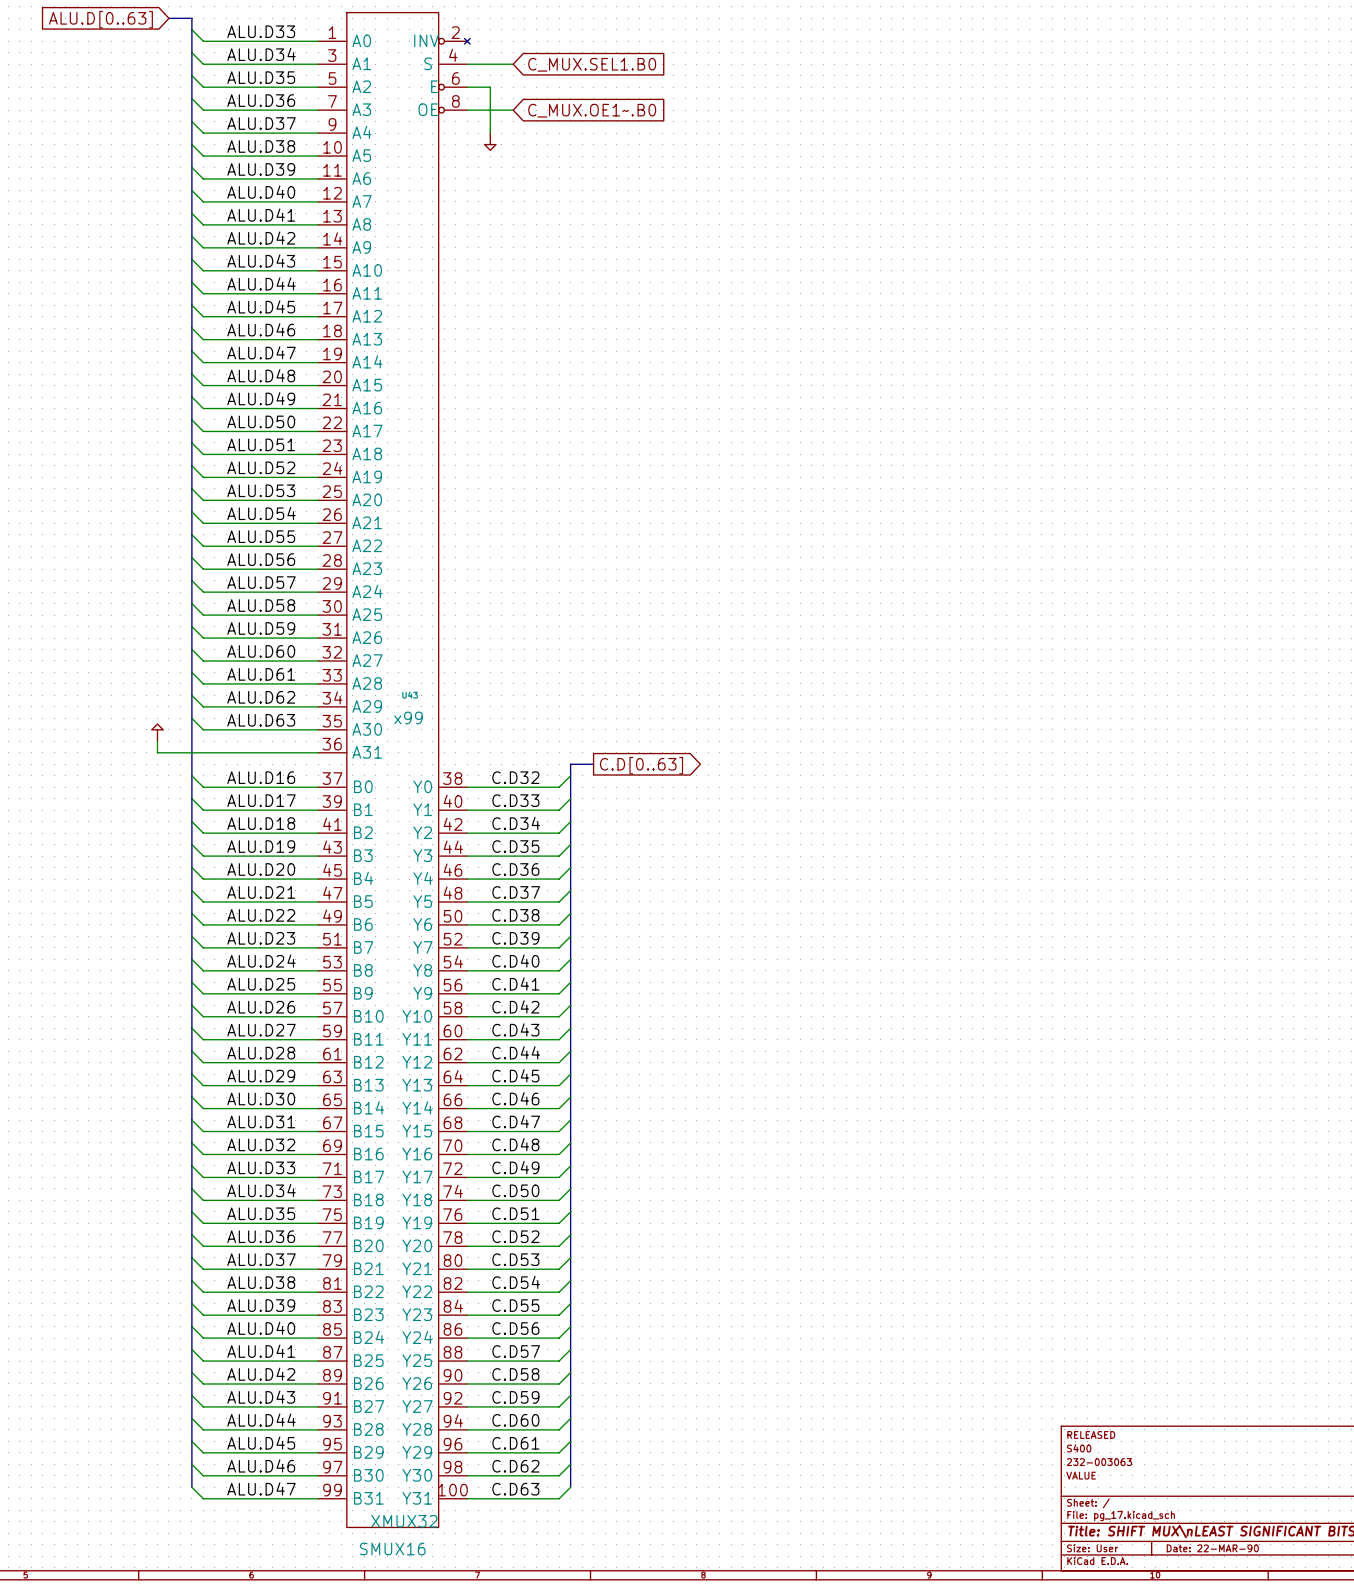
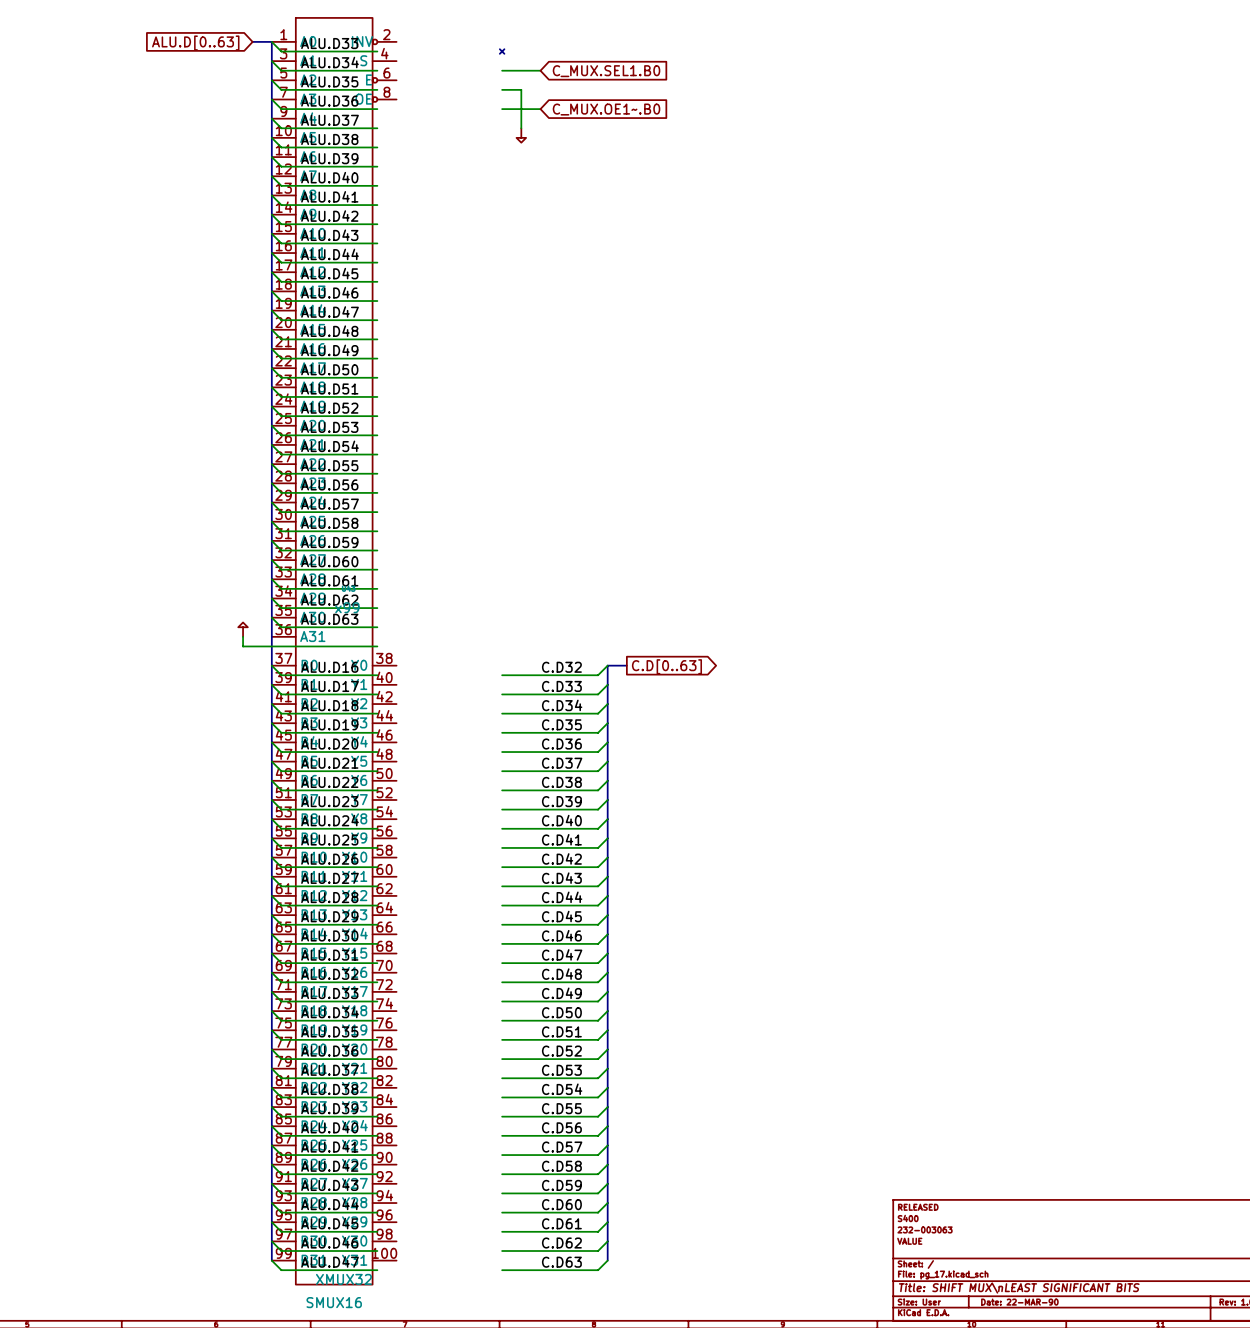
bus: (168, 18) (191, 18) (191, 1487) -> none
global label: ALU.D[0..63] (100, 19) -> none
wire: (191, 29) (203, 41) (318, 41) -> (377, 51) (281, 51) (271, 41)
label: ALU.D33 (261, 31) -> none
bus: none -> (252, 41) (271, 41) (271, 1260)
no-connect mark: (467, 41) -> none
global label: none -> ALU.D[0..63] (195, 43)
label: none -> ALU.D33 (329, 43)
wire: (191, 52) (203, 64) (318, 64) -> (377, 70) (281, 70) (271, 61)
no-connect mark: none -> (502, 51)
label: ALU.D34 (261, 54) -> none
wire: (467, 64) (513, 64) -> none
global label: C_MUX.SEL1.B0 (592, 64) -> none
label: none -> ALU.D34 (330, 62)
wire: (191, 75) (203, 87) (318, 87) -> (377, 89) (281, 89) (271, 80)
global label: none -> C_MUX.SEL1.B0 (606, 71)
label: ALU.D35 (261, 77) -> none
wire: (467, 87) (490, 87) (490, 133) -> none
label: none -> ALU.D35 (329, 81)
wire: (191, 98) (203, 110) (318, 110) -> (377, 109) (281, 109) (271, 99)
wire: none -> (502, 89) (521, 89) (521, 128)
label: ALU.D36 (261, 100) -> none
wire: (467, 110) (513, 110) -> none
global label: C_MUX.OE1~.B0 (592, 110) -> none
label: none -> ALU.D36 (329, 101)
wire: (191, 121) (203, 133) (318, 133) -> (377, 128) (281, 128) (271, 118)
global label: none -> C_MUX.OE1~.B0 (606, 109)
label: ALU.D37 (261, 123) -> none
label: none -> ALU.D37 (330, 120)
power symbol: (490, 141) -> none
wire: (191, 144) (203, 156) (318, 156) -> (377, 147) (281, 147) (271, 137)
label: ALU.D38 (261, 146) -> none
power symbol: none -> (521, 135)
label: none -> ALU.D38 (329, 139)
wire: (191, 167) (203, 178) (318, 178) -> (377, 166) (281, 166) (271, 157)
label: ALU.D39 (261, 169) -> none
label: none -> ALU.D39 (329, 158)
wire: (191, 190) (203, 201) (318, 201) -> (377, 185) (281, 185) (271, 176)
label: ALU.D40 (261, 192) -> none
label: none -> ALU.D40 (329, 177)
wire: (191, 213) (203, 224) (318, 224) -> (377, 205) (281, 205) (271, 195)
label: ALU.D41 (261, 215) -> none
label: none -> ALU.D41 (329, 196)
wire: (191, 236) (203, 247) (318, 247) -> (377, 224) (281, 224) (271, 214)
label: ALU.D42 (261, 238) -> none
label: none -> ALU.D42 (329, 216)
wire: (191, 259) (203, 270) (318, 270) -> (377, 243) (281, 243) (271, 233)
label: ALU.D43 (261, 260) -> none
label: none -> ALU.D43 (329, 235)
wire: (191, 282) (203, 293) (318, 293) -> (377, 262) (281, 262) (271, 253)
label: ALU.D44 (261, 283) -> none
label: none -> ALU.D44 (330, 254)
wire: (191, 305) (203, 316) (318, 316) -> (377, 281) (281, 281) (271, 272)
label: ALU.D45 (261, 306) -> none
label: none -> ALU.D45 (329, 273)
wire: (191, 328) (203, 339) (318, 339) -> (377, 301) (281, 301) (271, 291)
label: ALU.D46 (261, 329) -> none
label: none -> ALU.D46 (329, 292)
wire: (191, 351) (203, 362) (318, 362) -> (377, 320) (281, 320) (271, 310)
label: ALU.D47 (261, 352) -> none
label: none -> ALU.D47 (330, 311)
wire: (191, 374) (203, 385) (318, 385) -> (377, 339) (281, 339) (271, 329)
label: ALU.D48 (261, 375) -> none
label: none -> ALU.D48 (329, 331)
wire: (191, 397) (203, 408) (318, 408) -> (377, 358) (281, 358) (271, 348)
label: ALU.D49 (261, 398) -> none
label: none -> ALU.D49 (329, 350)
wire: (191, 419) (203, 431) (318, 431) -> (377, 377) (281, 377) (271, 368)
label: ALU.D50 (261, 421) -> none
label: none -> ALU.D50 (329, 369)
wire: (191, 442) (203, 454) (318, 454) -> (377, 396) (281, 396) (271, 387)
label: ALU.D51 (261, 444) -> none
label: none -> ALU.D51 (329, 388)
wire: (191, 465) (203, 477) (318, 477) -> (377, 416) (281, 416) (271, 406)
label: ALU.D52 (261, 467) -> none
label: none -> ALU.D52 (329, 408)
wire: (191, 488) (203, 500) (318, 500) -> (377, 435) (281, 435) (271, 425)
label: ALU.D53 (261, 490) -> none
label: none -> ALU.D53 (329, 427)
wire: (191, 511) (203, 523) (318, 523) -> (377, 454) (281, 454) (271, 444)
label: ALU.D54 (261, 513) -> none
label: none -> ALU.D54 (330, 446)
wire: (191, 534) (203, 546) (318, 546) -> (377, 473) (281, 473) (271, 464)
label: ALU.D55 (261, 536) -> none
label: none -> ALU.D55 (329, 465)
wire: (191, 557) (203, 569) (318, 569) -> (377, 492) (281, 492) (271, 483)
label: ALU.D56 (261, 559) -> none
label: none -> ALU.D56 (329, 484)
wire: (191, 580) (203, 592) (318, 592) -> (377, 512) (281, 512) (271, 502)
label: ALU.D57 (261, 582) -> none
label: none -> ALU.D57 (330, 504)
wire: (191, 603) (203, 615) (318, 615) -> (377, 531) (281, 531) (271, 521)
label: ALU.D58 (261, 605) -> none
label: none -> ALU.D58 (329, 523)
wire: (191, 626) (203, 638) (318, 638) -> (377, 550) (281, 550) (271, 540)
label: ALU.D59 (261, 628) -> none
label: none -> ALU.D59 (329, 542)
wire: (191, 649) (203, 660) (318, 660) -> (377, 569) (281, 569) (271, 560)
label: ALU.D60 (261, 651) -> none
label: none -> ALU.D60 (329, 561)
wire: (191, 672) (203, 683) (318, 683) -> (377, 588) (281, 588) (271, 579)
label: ALU.D61 (261, 674) -> none
label: none -> ALU.D61 (329, 580)
wire: (191, 695) (203, 706) (318, 706) -> (377, 608) (281, 608) (271, 598)
label: ALU.D62 (261, 697) -> none
label: none -> ALU.D62 (329, 600)
wire: (191, 718) (203, 729) (318, 729) -> (377, 627) (281, 627) (271, 617)
label: ALU.D63 (261, 720) -> none
label: none -> ALU.D63 (329, 619)
power symbol: (157, 732) -> none
wire: (157, 741) (157, 752) (318, 752) -> none
power symbol: none -> (243, 629)
wire: none -> (243, 636) (243, 646) (377, 646)
bus: (593, 764) (570, 764) (570, 1487) -> none
global label: C.D[0..63] (641, 765) -> none
wire: (191, 775) (203, 787) (318, 787) -> (377, 675) (281, 675) (271, 665)
wire: (570, 775) (559, 787) (467, 787) -> none
label: ALU.D16 (261, 777) -> none
label: C.D32 (515, 777) -> none
wire: none -> (607, 665) (598, 675) (502, 675)
bus: none -> (626, 665) (607, 665) (607, 1260)
global label: none -> C.D[0..63] (666, 666)
label: none -> ALU.D16 (329, 667)
label: none -> C.D32 (561, 667)
wire: (191, 798) (203, 810) (318, 810) -> (377, 694) (281, 694) (271, 684)
wire: (570, 798) (559, 810) (467, 810) -> none
label: ALU.D17 (261, 800) -> none
label: C.D33 (515, 800) -> none
wire: none -> (607, 684) (598, 694) (502, 694)
label: none -> ALU.D17 (330, 686)
label: none -> C.D33 (561, 686)
wire: (191, 821) (203, 833) (318, 833) -> (377, 713) (281, 713) (271, 704)
wire: (570, 821) (559, 833) (467, 833) -> none
label: ALU.D18 (261, 823) -> none
label: C.D34 (516, 823) -> none
wire: none -> (607, 704) (598, 713) (502, 713)
label: none -> C.D34 (562, 705)
label: none -> ALU.D18 (329, 705)
wire: (191, 844) (203, 856) (318, 856) -> (377, 732) (281, 732) (271, 723)
wire: (570, 844) (559, 856) (467, 856) -> none
label: ALU.D19 (261, 846) -> none
label: C.D35 (515, 846) -> none
wire: none -> (607, 723) (598, 732) (502, 732)
label: none -> ALU.D19 (329, 724)
label: none -> C.D35 (561, 724)
wire: (191, 867) (203, 879) (318, 879) -> (377, 752) (281, 752) (271, 742)
wire: (570, 867) (559, 879) (467, 879) -> none
label: ALU.D20 (261, 869) -> none
label: C.D36 (515, 869) -> none
wire: none -> (607, 742) (598, 752) (502, 752)
label: none -> ALU.D20 (329, 744)
label: none -> C.D36 (561, 744)
wire: (191, 890) (203, 901) (318, 901) -> (377, 771) (281, 771) (271, 761)
wire: (570, 890) (559, 901) (467, 901) -> none
label: ALU.D21 (261, 892) -> none
label: C.D37 (516, 892) -> none
wire: none -> (607, 761) (598, 771) (502, 771)
label: none -> ALU.D21 (329, 763)
label: none -> C.D37 (562, 763)
wire: (191, 913) (203, 924) (318, 924) -> (377, 790) (281, 790) (271, 780)
wire: (570, 913) (559, 924) (467, 924) -> none
label: ALU.D22 (261, 915) -> none
label: C.D38 (515, 915) -> none
wire: none -> (607, 780) (598, 790) (502, 790)
label: none -> ALU.D22 (329, 782)
label: none -> C.D38 (561, 782)
wire: (191, 936) (203, 947) (318, 947) -> (377, 809) (281, 809) (271, 799)
wire: (570, 936) (559, 947) (467, 947) -> none
label: ALU.D23 (261, 938) -> none
label: C.D39 (515, 938) -> none
wire: none -> (607, 799) (598, 809) (502, 809)
label: none -> ALU.D23 (329, 801)
label: none -> C.D39 (561, 801)
wire: (191, 959) (203, 970) (318, 970) -> (377, 828) (281, 828) (271, 819)
wire: (570, 959) (559, 970) (467, 970) -> none
label: ALU.D24 (261, 961) -> none
label: C.D40 (515, 961) -> none
wire: none -> (607, 819) (598, 828) (502, 828)
label: none -> ALU.D24 (330, 820)
label: none -> C.D40 (561, 820)
wire: (191, 982) (203, 993) (318, 993) -> (377, 847) (281, 847) (271, 838)
wire: (570, 982) (559, 993) (467, 993) -> none
label: C.D41 (515, 983) -> none
label: ALU.D25 (261, 984) -> none
wire: none -> (607, 838) (598, 847) (502, 847)
label: none -> ALU.D25 (329, 839)
label: none -> C.D41 (561, 839)
wire: (191, 1005) (203, 1016) (318, 1016) -> (377, 867) (281, 867) (271, 857)
wire: (570, 1005) (559, 1016) (467, 1016) -> none
label: C.D42 (515, 1006) -> none
label: ALU.D26 (261, 1007) -> none
wire: none -> (607, 857) (598, 867) (502, 867)
label: none -> ALU.D26 (329, 859)
label: none -> C.D42 (561, 858)
wire: (191, 1028) (203, 1039) (318, 1039) -> (377, 886) (281, 886) (271, 876)
wire: (570, 1028) (559, 1039) (467, 1039) -> none
label: C.D43 (515, 1029) -> none
label: ALU.D27 (261, 1030) -> none
wire: none -> (607, 876) (598, 886) (502, 886)
label: none -> ALU.D27 (330, 878)
label: none -> C.D43 (561, 878)
wire: (191, 1051) (203, 1062) (318, 1062) -> (377, 905) (281, 905) (271, 895)
wire: (570, 1051) (559, 1062) (467, 1062) -> none
label: C.D44 (516, 1052) -> none
label: ALU.D28 (261, 1053) -> none
wire: none -> (607, 895) (598, 905) (502, 905)
label: none -> ALU.D28 (329, 897)
label: none -> C.D44 (562, 897)
wire: (191, 1074) (203, 1085) (318, 1085) -> (377, 924) (281, 924) (271, 915)
wire: (570, 1074) (559, 1085) (467, 1085) -> none
label: C.D45 (515, 1075) -> none
label: ALU.D29 (261, 1076) -> none
wire: none -> (607, 915) (598, 924) (502, 924)
label: none -> ALU.D29 (329, 916)
label: none -> C.D45 (561, 916)
wire: (191, 1097) (203, 1108) (318, 1108) -> (377, 943) (281, 943) (271, 934)
wire: (570, 1097) (559, 1108) (467, 1108) -> none
label: C.D46 (515, 1098) -> none
label: ALU.D30 (261, 1099) -> none
wire: none -> (607, 934) (598, 943) (502, 943)
label: none -> ALU.D30 (329, 935)
label: none -> C.D46 (561, 935)
wire: (191, 1120) (203, 1131) (318, 1131) -> (377, 963) (281, 963) (271, 953)
wire: (570, 1120) (559, 1131) (467, 1131) -> none
label: ALU.D31 (261, 1121) -> none
label: C.D47 (516, 1121) -> none
wire: none -> (607, 953) (598, 963) (502, 963)
label: none -> ALU.D31 (329, 955)
label: none -> C.D47 (562, 954)
wire: (191, 1142) (203, 1154) (318, 1154) -> (377, 982) (281, 982) (271, 972)
wire: (570, 1142) (559, 1154) (467, 1154) -> none
label: ALU.D32 (261, 1144) -> none
label: C.D48 (515, 1144) -> none
wire: none -> (607, 972) (598, 982) (502, 982)
label: none -> ALU.D32 (329, 974)
label: none -> C.D48 (561, 974)
wire: (191, 1165) (203, 1177) (318, 1177) -> (377, 1001) (281, 1001) (271, 991)
wire: (570, 1165) (559, 1177) (467, 1177) -> none
label: ALU.D33 (261, 1167) -> none
label: C.D49 (515, 1167) -> none
wire: none -> (607, 991) (598, 1001) (502, 1001)
label: none -> ALU.D33 (329, 993)
label: none -> C.D49 (561, 993)
wire: (191, 1188) (203, 1200) (318, 1200) -> (377, 1020) (281, 1020) (271, 1011)
wire: (570, 1188) (559, 1200) (467, 1200) -> none
label: ALU.D34 (261, 1190) -> none
label: C.D50 (515, 1190) -> none
wire: none -> (607, 1011) (598, 1020) (502, 1020)
label: none -> ALU.D34 (330, 1012)
label: none -> C.D50 (561, 1012)
wire: (191, 1211) (203, 1223) (318, 1223) -> (377, 1039) (281, 1039) (271, 1030)
wire: (570, 1211) (559, 1223) (467, 1223) -> none
label: ALU.D35 (261, 1213) -> none
label: C.D51 (515, 1213) -> none
wire: none -> (607, 1030) (598, 1039) (502, 1039)
label: none -> ALU.D35 (329, 1031)
label: none -> C.D51 (561, 1031)
wire: (191, 1234) (203, 1246) (318, 1246) -> (377, 1059) (281, 1059) (271, 1049)
wire: (570, 1234) (559, 1246) (467, 1246) -> none
label: ALU.D36 (261, 1236) -> none
label: C.D52 (515, 1236) -> none
wire: none -> (607, 1049) (598, 1059) (502, 1059)
label: none -> ALU.D36 (329, 1051)
label: none -> C.D52 (561, 1051)
wire: (191, 1257) (203, 1269) (318, 1269) -> (377, 1078) (281, 1078) (271, 1068)
wire: (570, 1257) (559, 1269) (467, 1269) -> none
label: ALU.D37 (261, 1259) -> none
label: C.D53 (515, 1259) -> none
wire: none -> (607, 1068) (598, 1078) (502, 1078)
label: none -> ALU.D37 (330, 1070)
label: none -> C.D53 (561, 1070)
wire: (191, 1280) (203, 1292) (318, 1292) -> (377, 1097) (281, 1097) (271, 1087)
wire: (570, 1280) (559, 1292) (467, 1292) -> none
label: ALU.D38 (261, 1282) -> none
label: C.D54 (516, 1282) -> none
wire: none -> (607, 1087) (598, 1097) (502, 1097)
label: none -> C.D54 (562, 1089)
label: none -> ALU.D38 (329, 1089)
wire: (191, 1303) (203, 1315) (318, 1315) -> (377, 1116) (281, 1116) (271, 1107)
wire: (570, 1303) (559, 1315) (467, 1315) -> none
label: ALU.D39 (261, 1305) -> none
label: C.D55 (515, 1305) -> none
wire: none -> (607, 1107) (598, 1116) (502, 1116)
label: none -> ALU.D39 (329, 1108)
label: none -> C.D55 (561, 1108)
wire: (191, 1326) (203, 1338) (318, 1338) -> (377, 1135) (281, 1135) (271, 1126)
wire: (570, 1326) (559, 1338) (467, 1338) -> none
label: ALU.D40 (261, 1328) -> none
label: C.D56 (515, 1328) -> none
wire: none -> (607, 1126) (598, 1135) (502, 1135)
label: none -> ALU.D40 (329, 1127)
label: none -> C.D56 (561, 1127)
wire: (191, 1349) (203, 1361) (318, 1361) -> (377, 1155) (281, 1155) (271, 1145)
wire: (570, 1349) (559, 1361) (467, 1361) -> none
label: ALU.D41 (261, 1351) -> none
label: C.D57 (516, 1351) -> none
wire: none -> (607, 1145) (598, 1155) (502, 1155)
label: none -> ALU.D41 (329, 1146)
label: none -> C.D57 (562, 1147)
wire: (191, 1372) (203, 1383) (318, 1383) -> (377, 1174) (281, 1174) (271, 1164)
wire: (570, 1372) (559, 1383) (467, 1383) -> none
label: ALU.D42 (261, 1374) -> none
label: C.D58 (515, 1374) -> none
wire: none -> (607, 1164) (598, 1174) (502, 1174)
label: none -> ALU.D42 (329, 1166)
label: none -> C.D58 (561, 1166)
wire: (191, 1395) (203, 1406) (318, 1406) -> (377, 1193) (281, 1193) (271, 1183)
wire: (570, 1395) (559, 1406) (467, 1406) -> none
label: ALU.D43 (261, 1397) -> none
label: C.D59 (515, 1397) -> none
wire: none -> (607, 1183) (598, 1193) (502, 1193)
label: none -> ALU.D43 (329, 1185)
label: none -> C.D59 (561, 1185)
wire: (191, 1418) (203, 1429) (318, 1429) -> (377, 1212) (281, 1212) (271, 1203)
wire: (570, 1418) (559, 1429) (467, 1429) -> none
label: ALU.D44 (261, 1420) -> none
label: C.D60 (515, 1420) -> none
wire: none -> (607, 1203) (598, 1212) (502, 1212)
label: none -> ALU.D44 (330, 1204)
label: none -> C.D60 (561, 1204)
wire: (191, 1441) (203, 1452) (318, 1452) -> (377, 1231) (281, 1231) (271, 1222)
wire: (570, 1441) (559, 1452) (467, 1452) -> none
label: ALU.D45 (261, 1443) -> none
label: C.D61 (515, 1443) -> none
wire: none -> (607, 1222) (598, 1231) (502, 1231)
label: none -> ALU.D45 (329, 1223)
label: none -> C.D61 (561, 1223)
wire: (191, 1464) (203, 1475) (318, 1475) -> (377, 1251) (281, 1251) (271, 1241)
wire: (570, 1464) (559, 1475) (467, 1475) -> none
label: ALU.D46 (261, 1465) -> none
label: C.D62 (515, 1466) -> none
wire: none -> (607, 1241) (598, 1251) (502, 1251)
label: none -> ALU.D46 (329, 1242)
label: none -> C.D62 (561, 1243)
wire: (191, 1487) (203, 1498) (318, 1498) -> (377, 1270) (281, 1270) (271, 1260)
wire: (570, 1487) (559, 1498) (467, 1498) -> none
label: ALU.D47 (261, 1488) -> none
label: C.D63 (515, 1489) -> none
wire: none -> (607, 1260) (598, 1270) (502, 1270)
label: none -> ALU.D47 (330, 1261)
label: none -> C.D63 (561, 1262)

